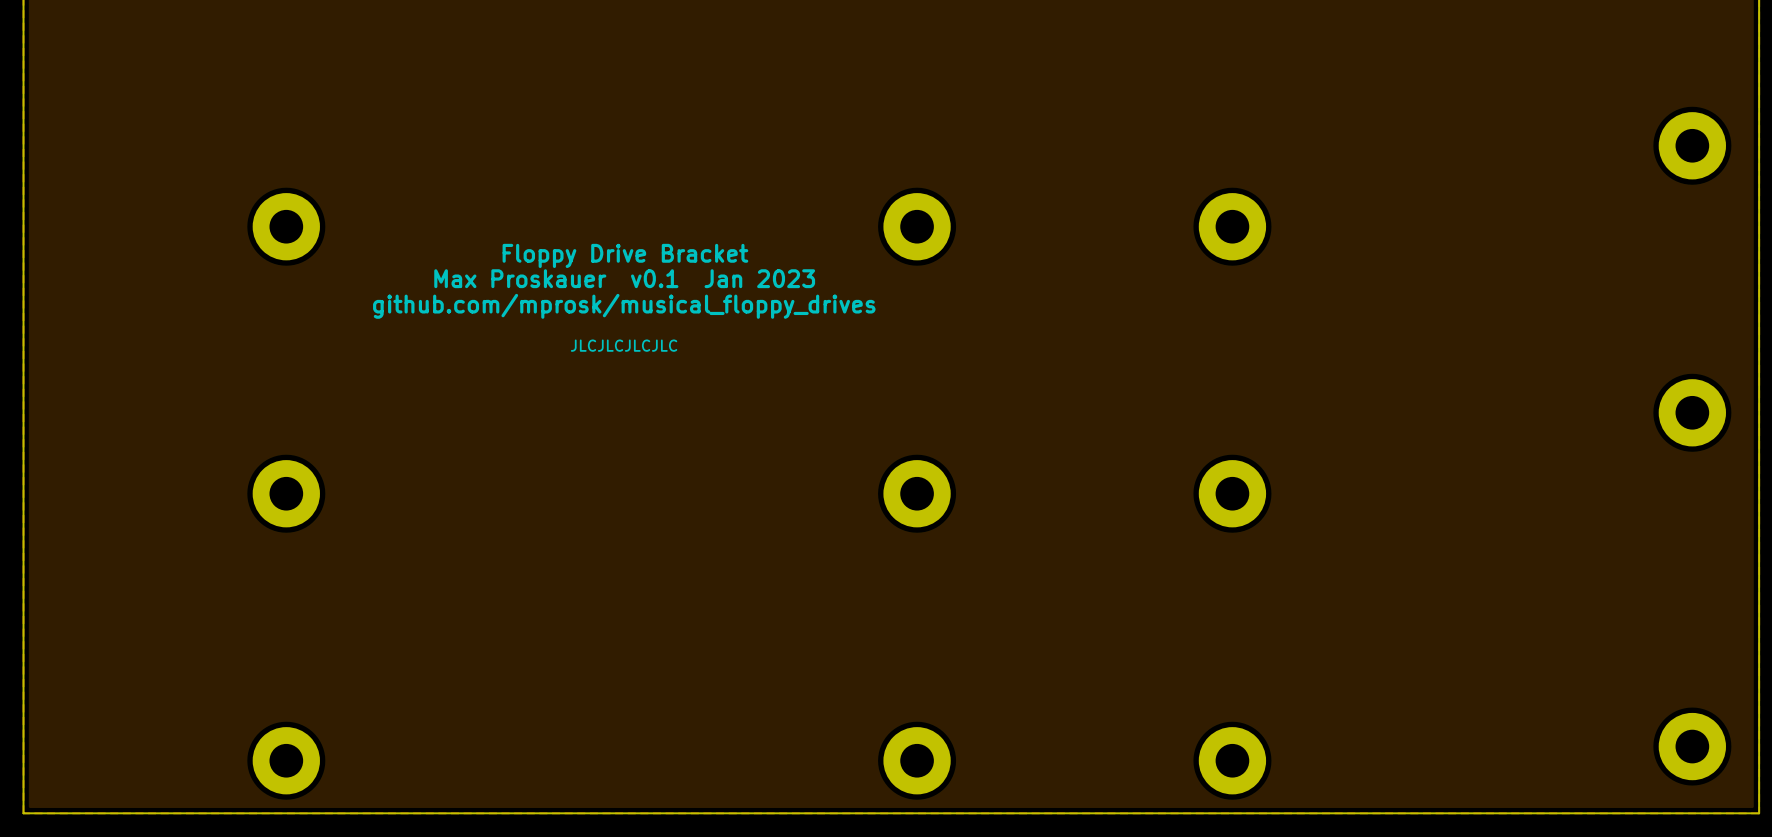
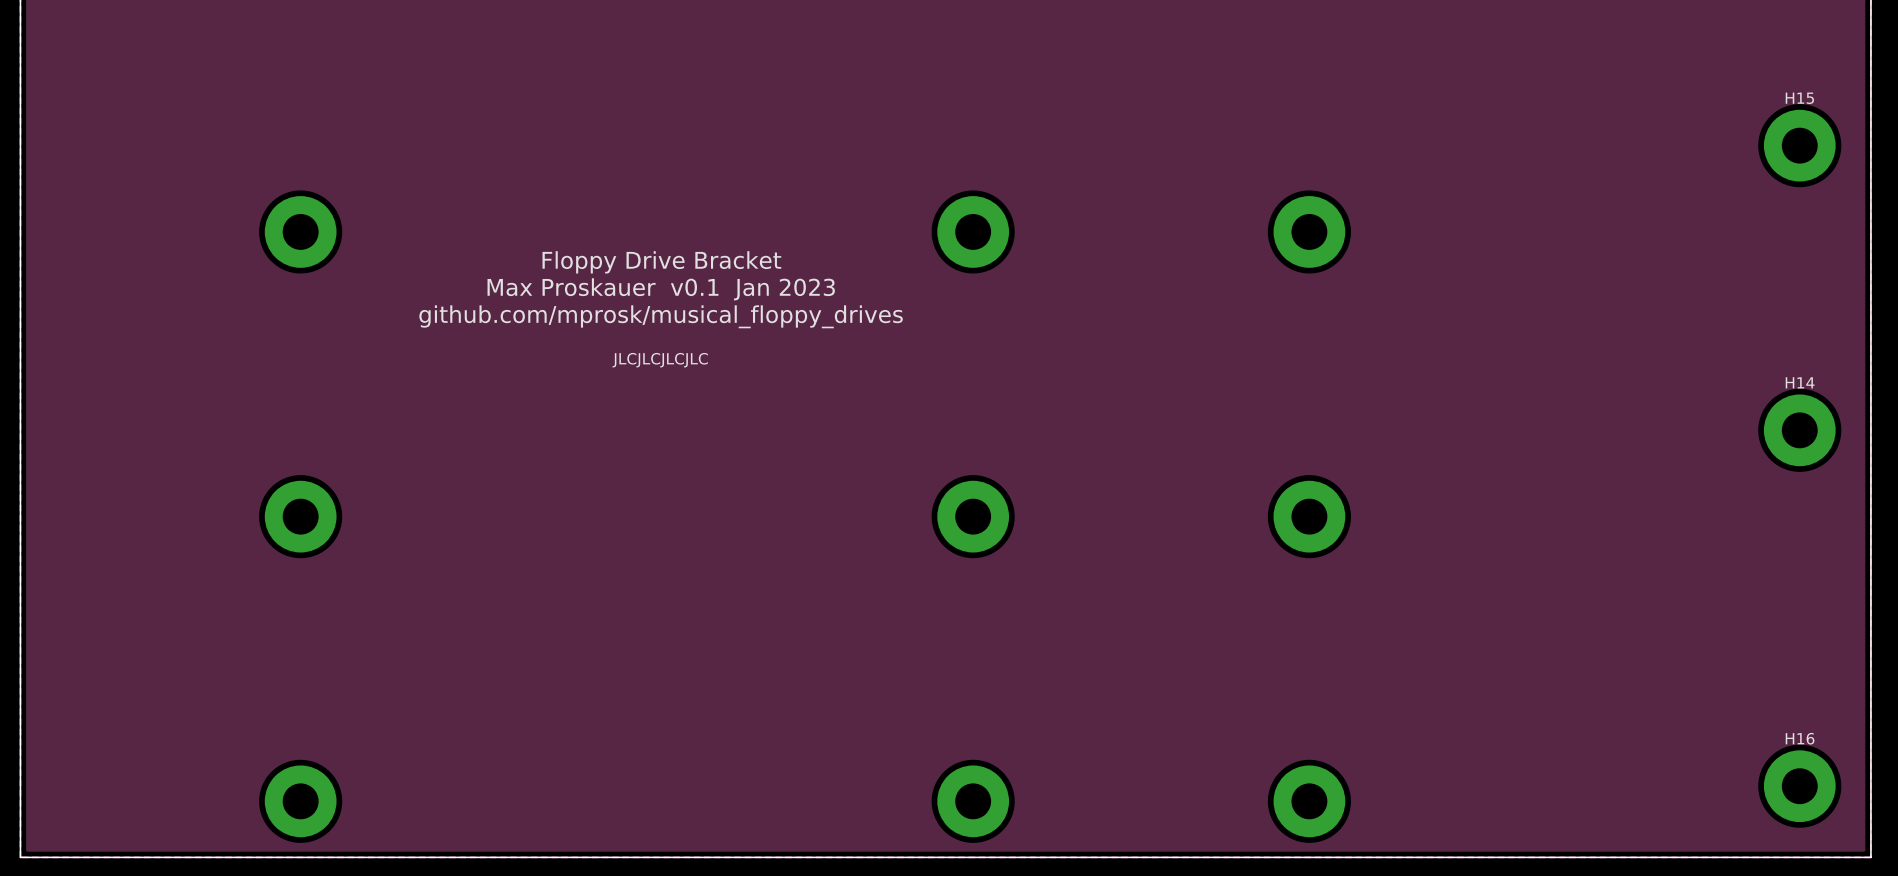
H15 name: none -> H15 (1799, 98)
H14 name: none -> H14 (1800, 382)
H16 name: none -> H16 (1800, 738)

